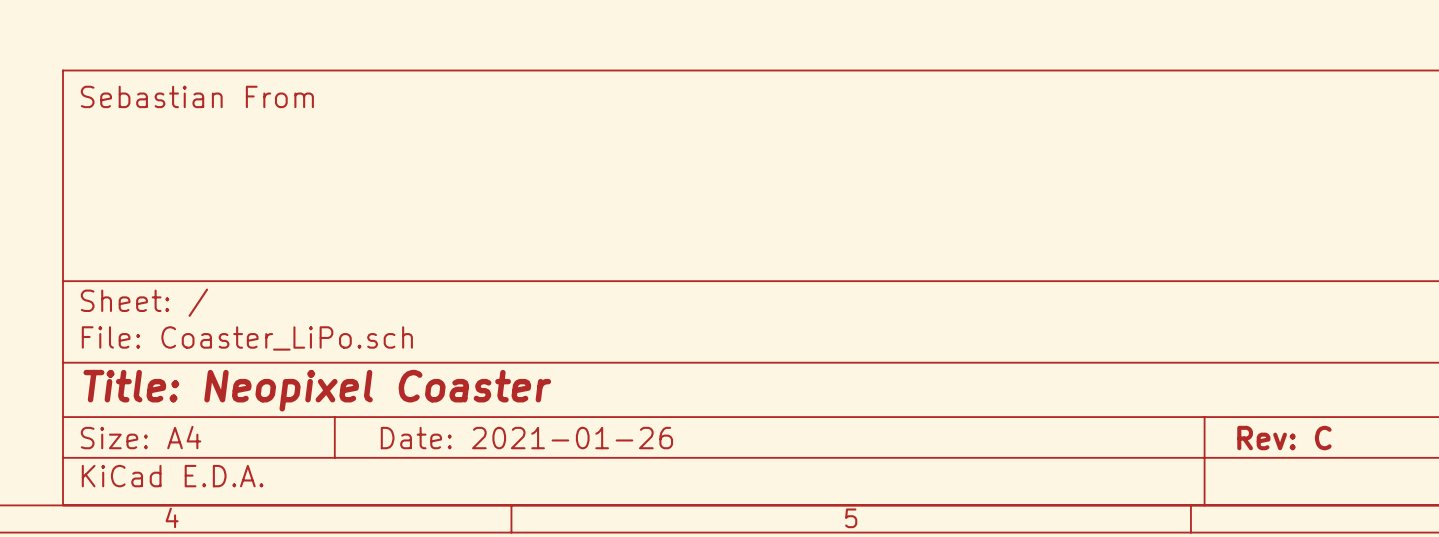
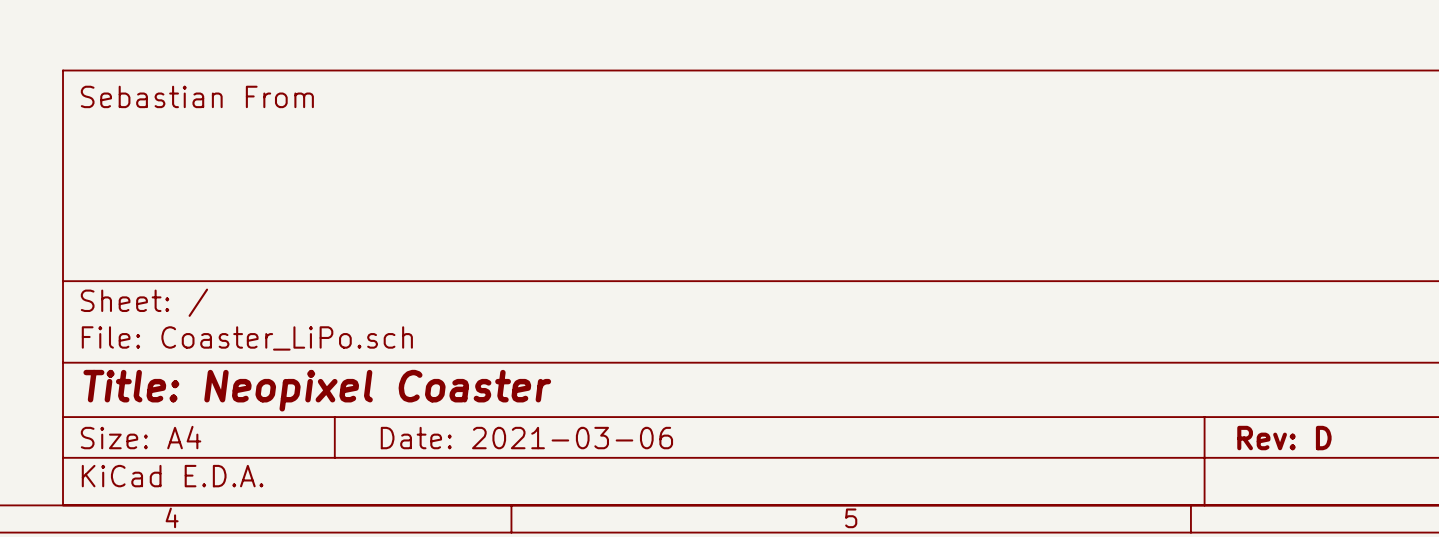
title block: Date: 2021-01-26 (526, 438) -> Date: 2021-03-06 (526, 438)
title block: Rev: C (1284, 438) -> Rev: D (1284, 438)

